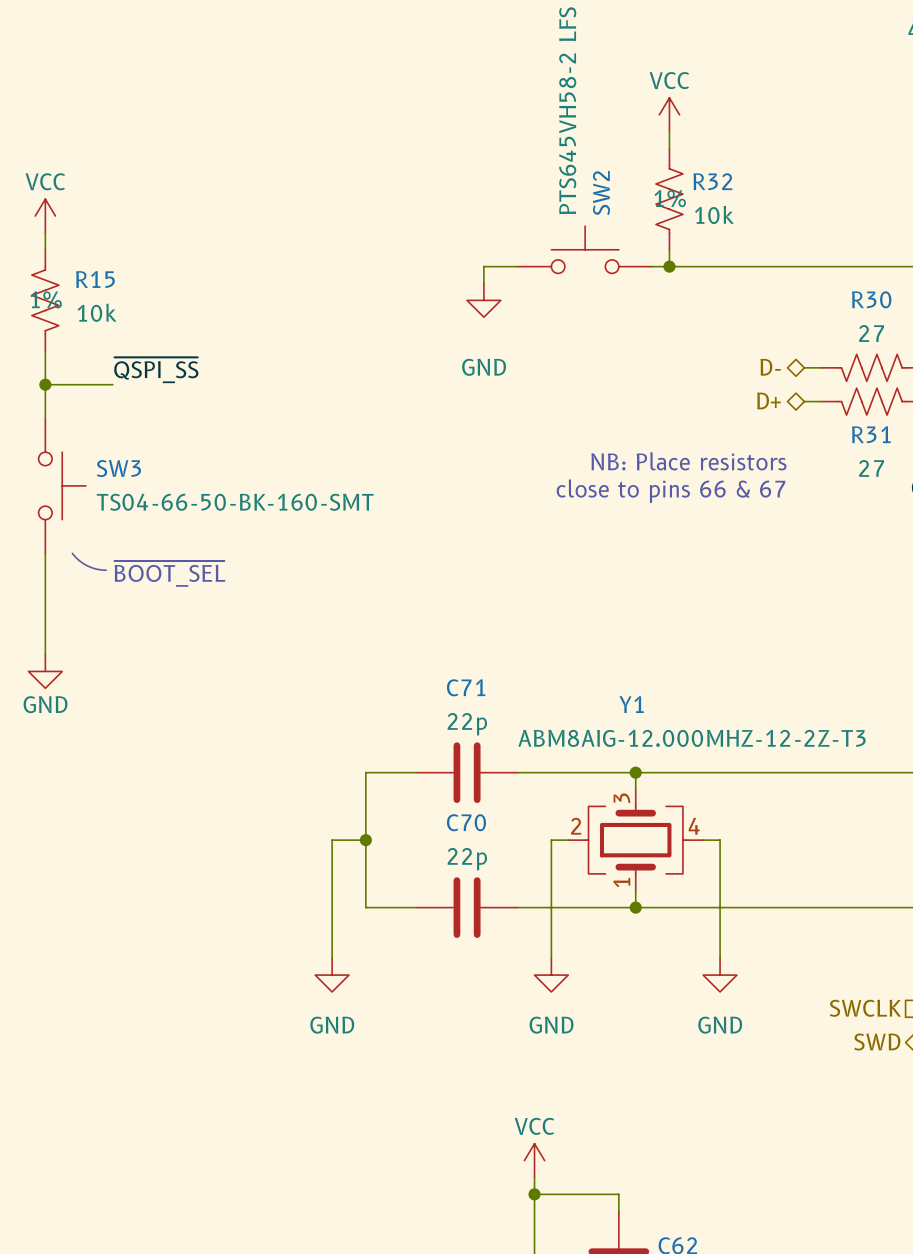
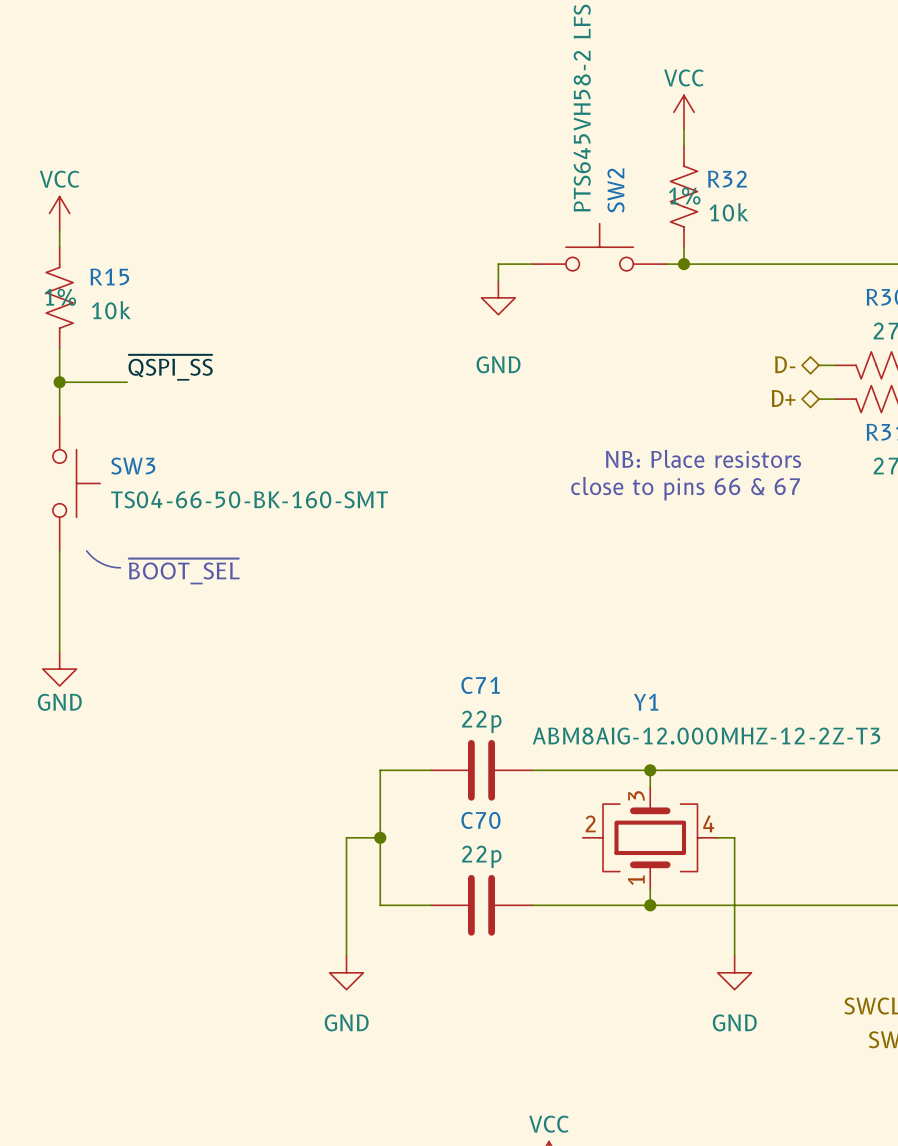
wire: (568, 840) (551, 840) (551, 958) -> none
power symbol: GND (551, 975) -> none

